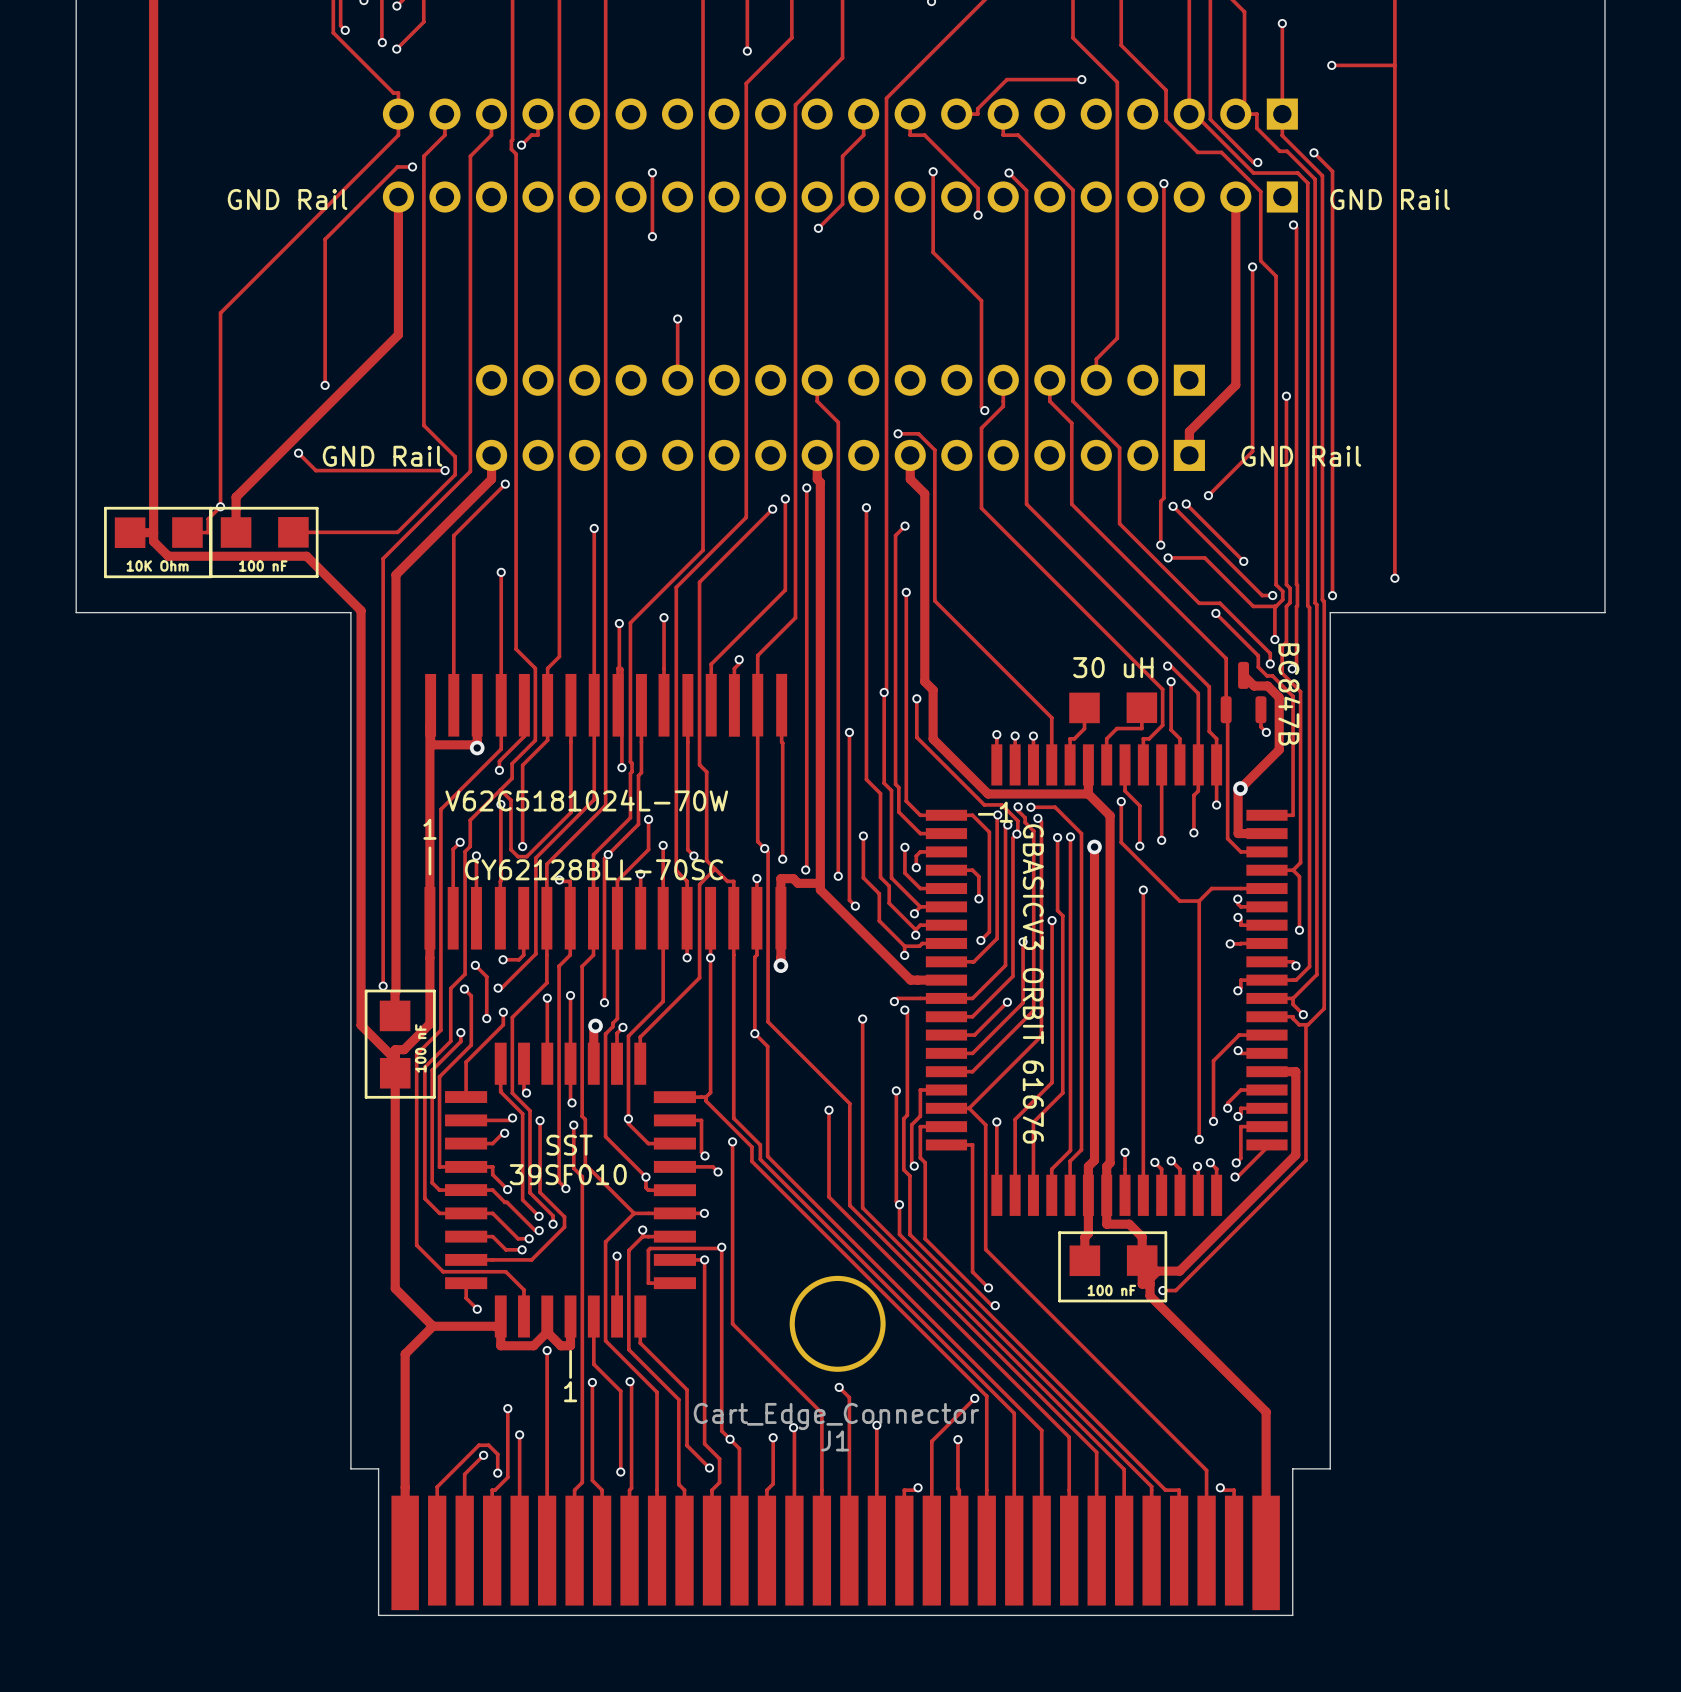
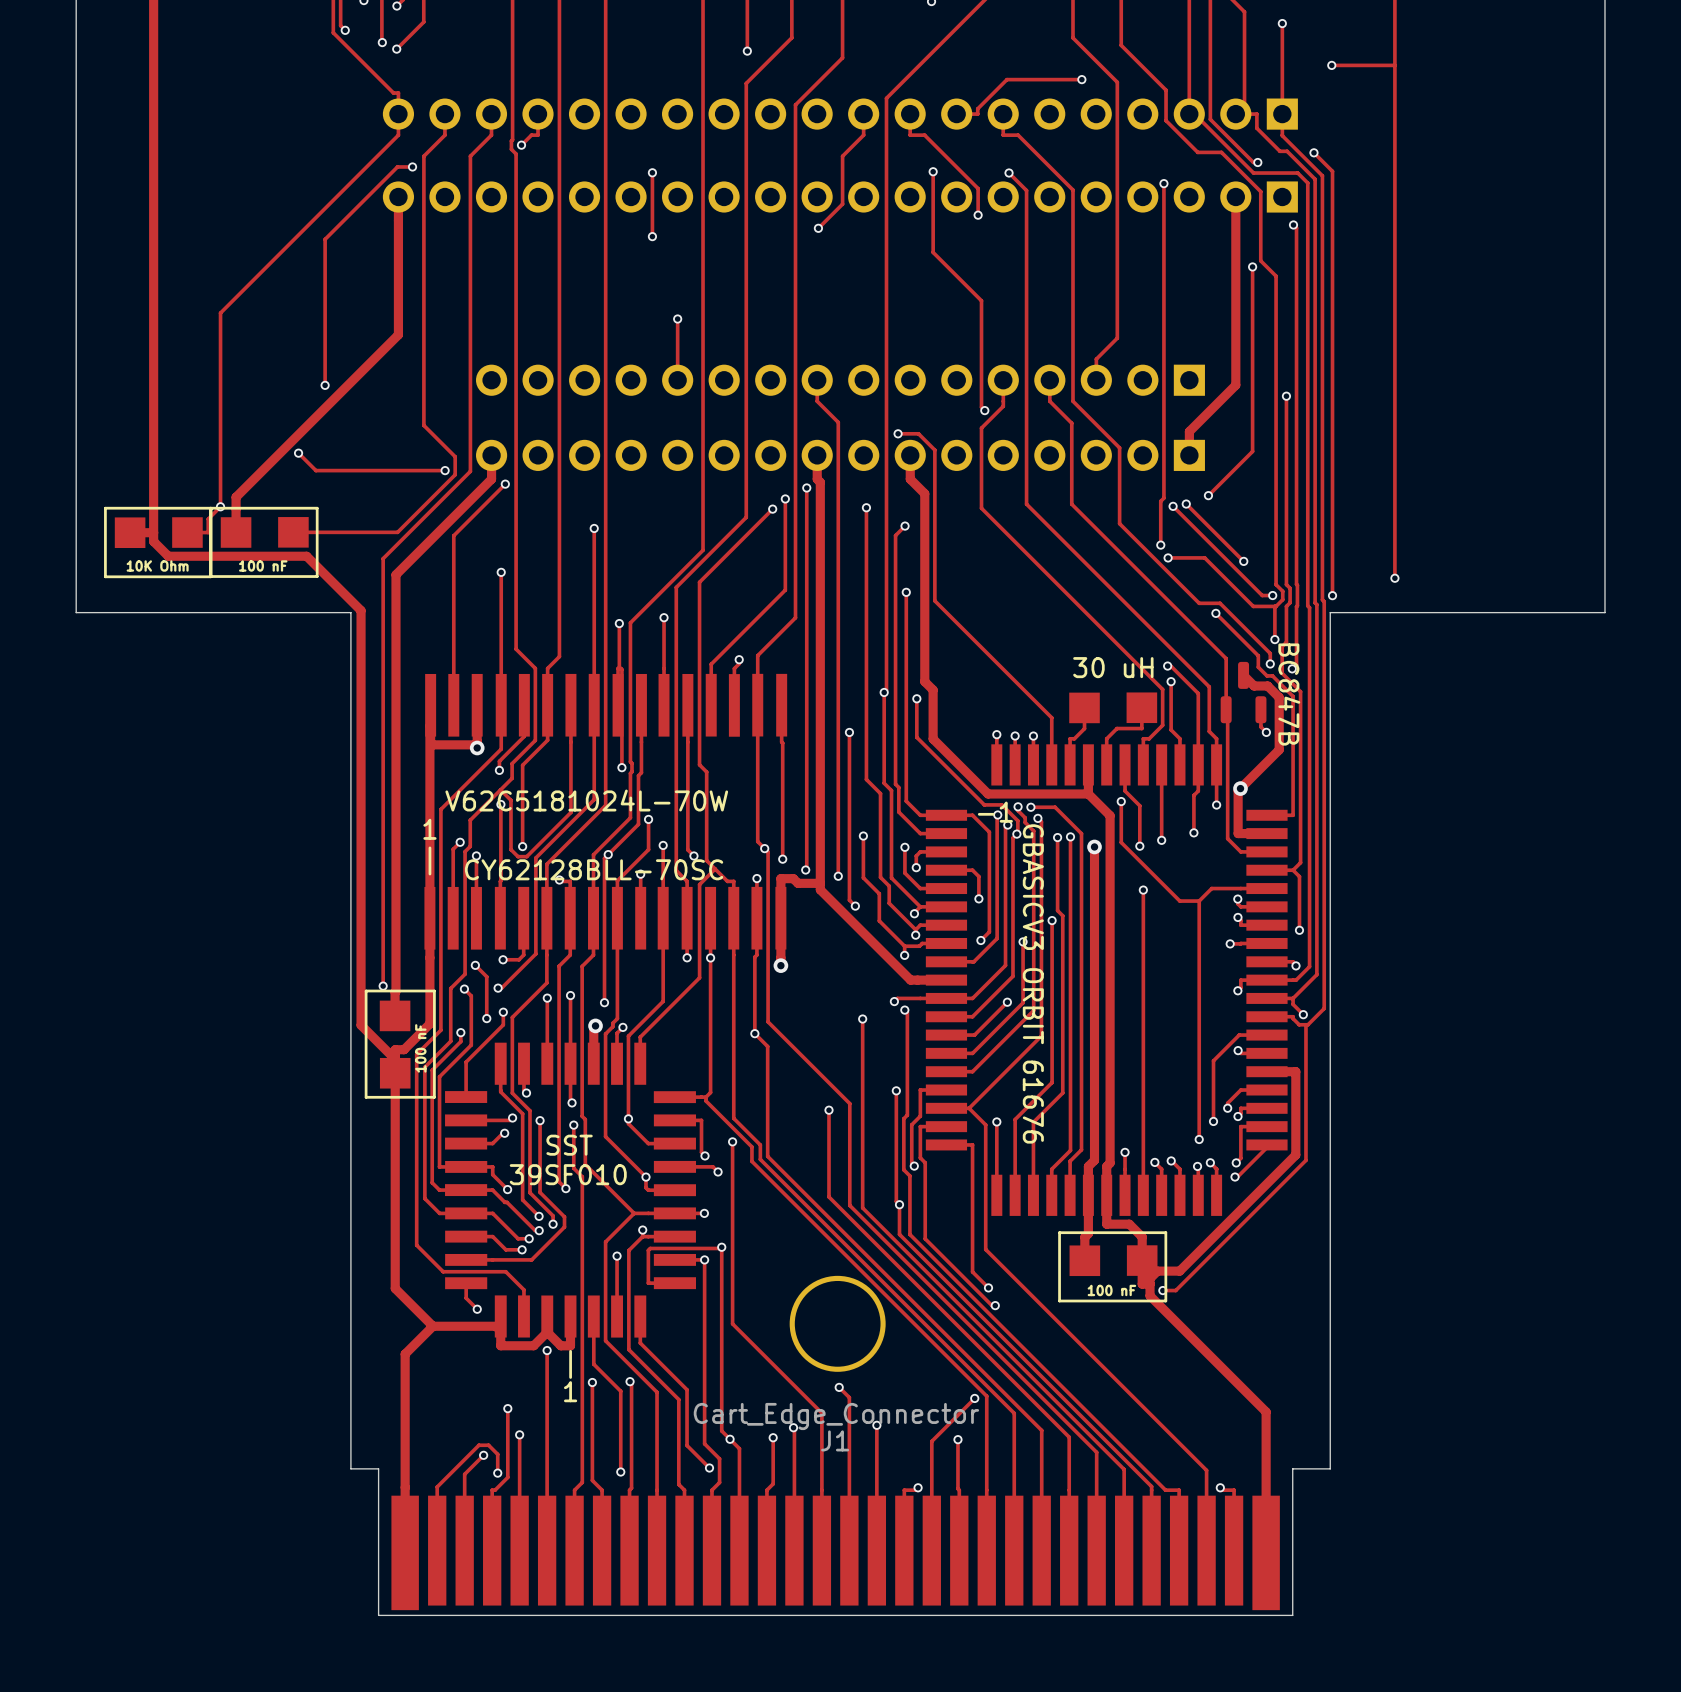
text: GND Rail (287, 199) -> none
text: GND Rail (1390, 199) -> none
text: GND Rail (382, 456) -> none
text: GND Rail (1301, 456) -> none

